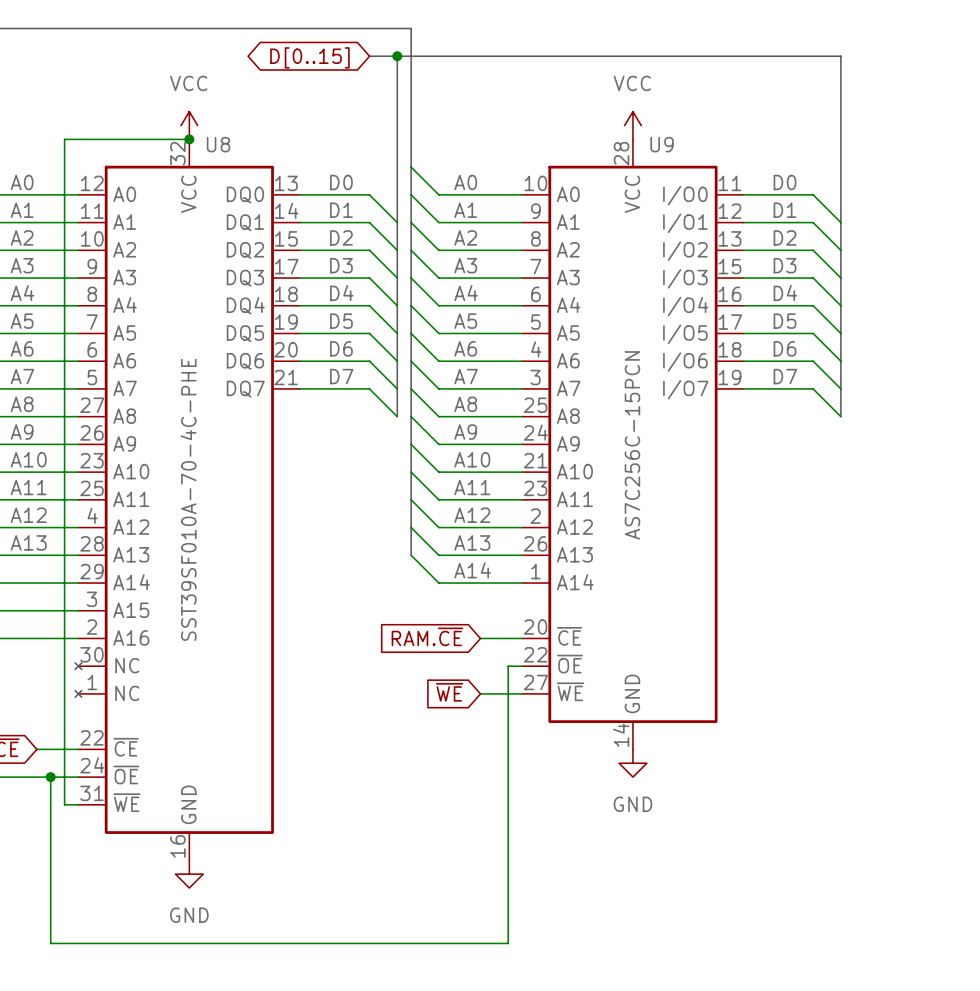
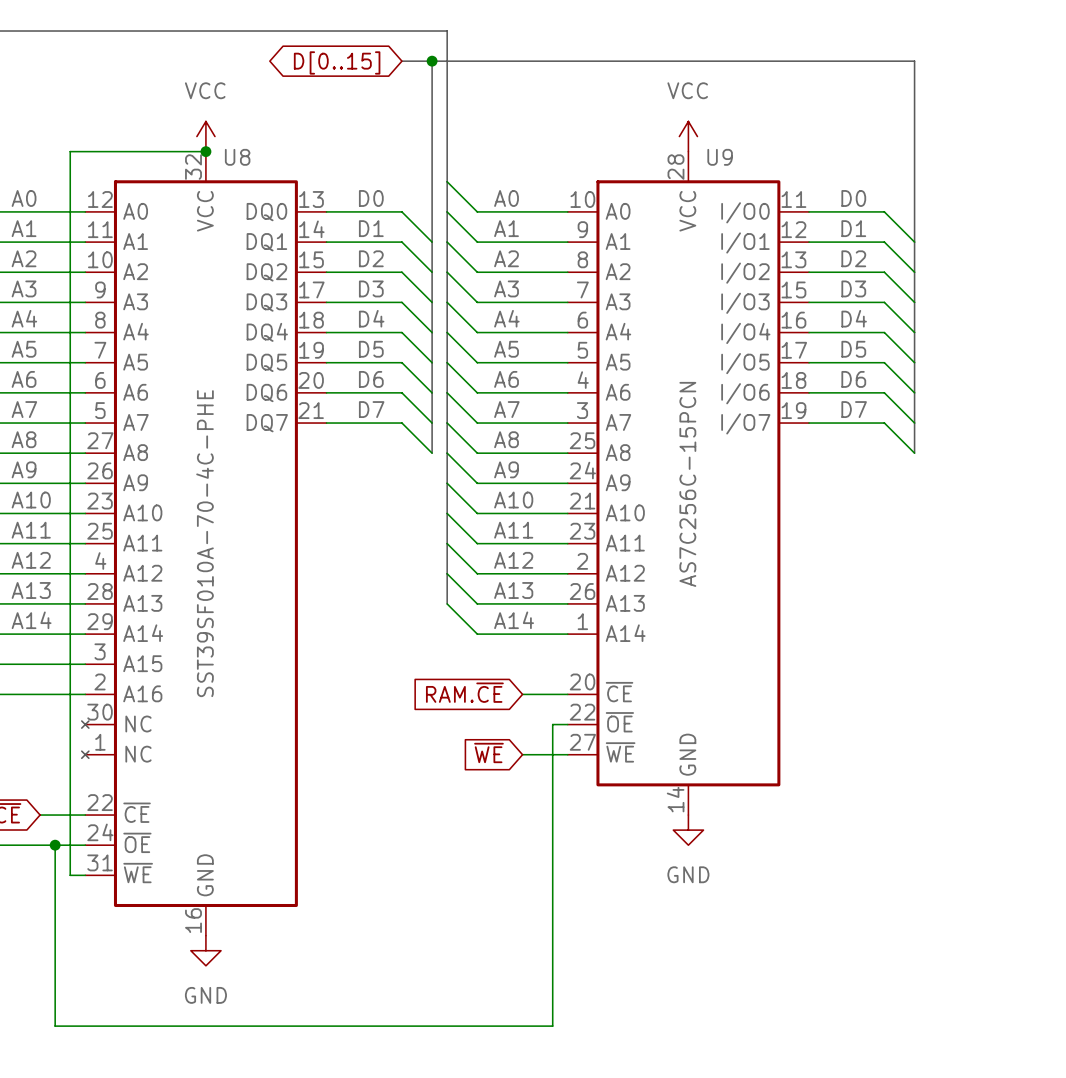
label: none -> A14 (31, 620)

